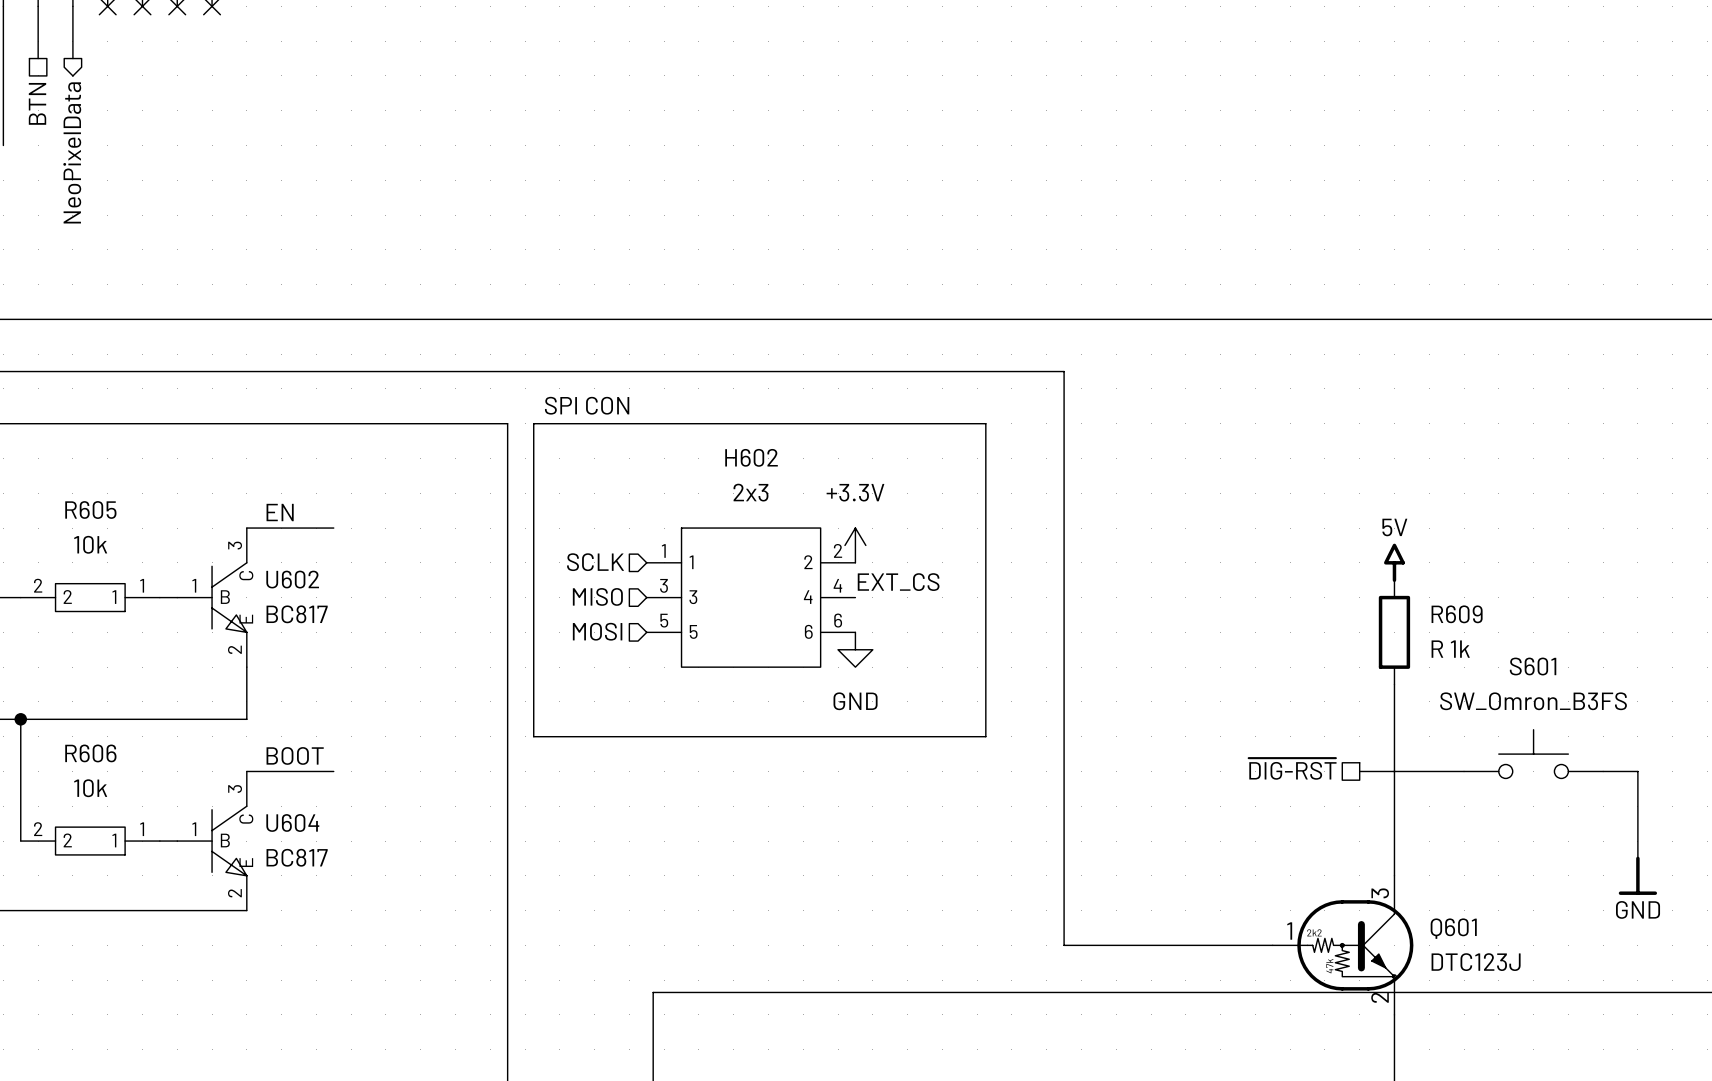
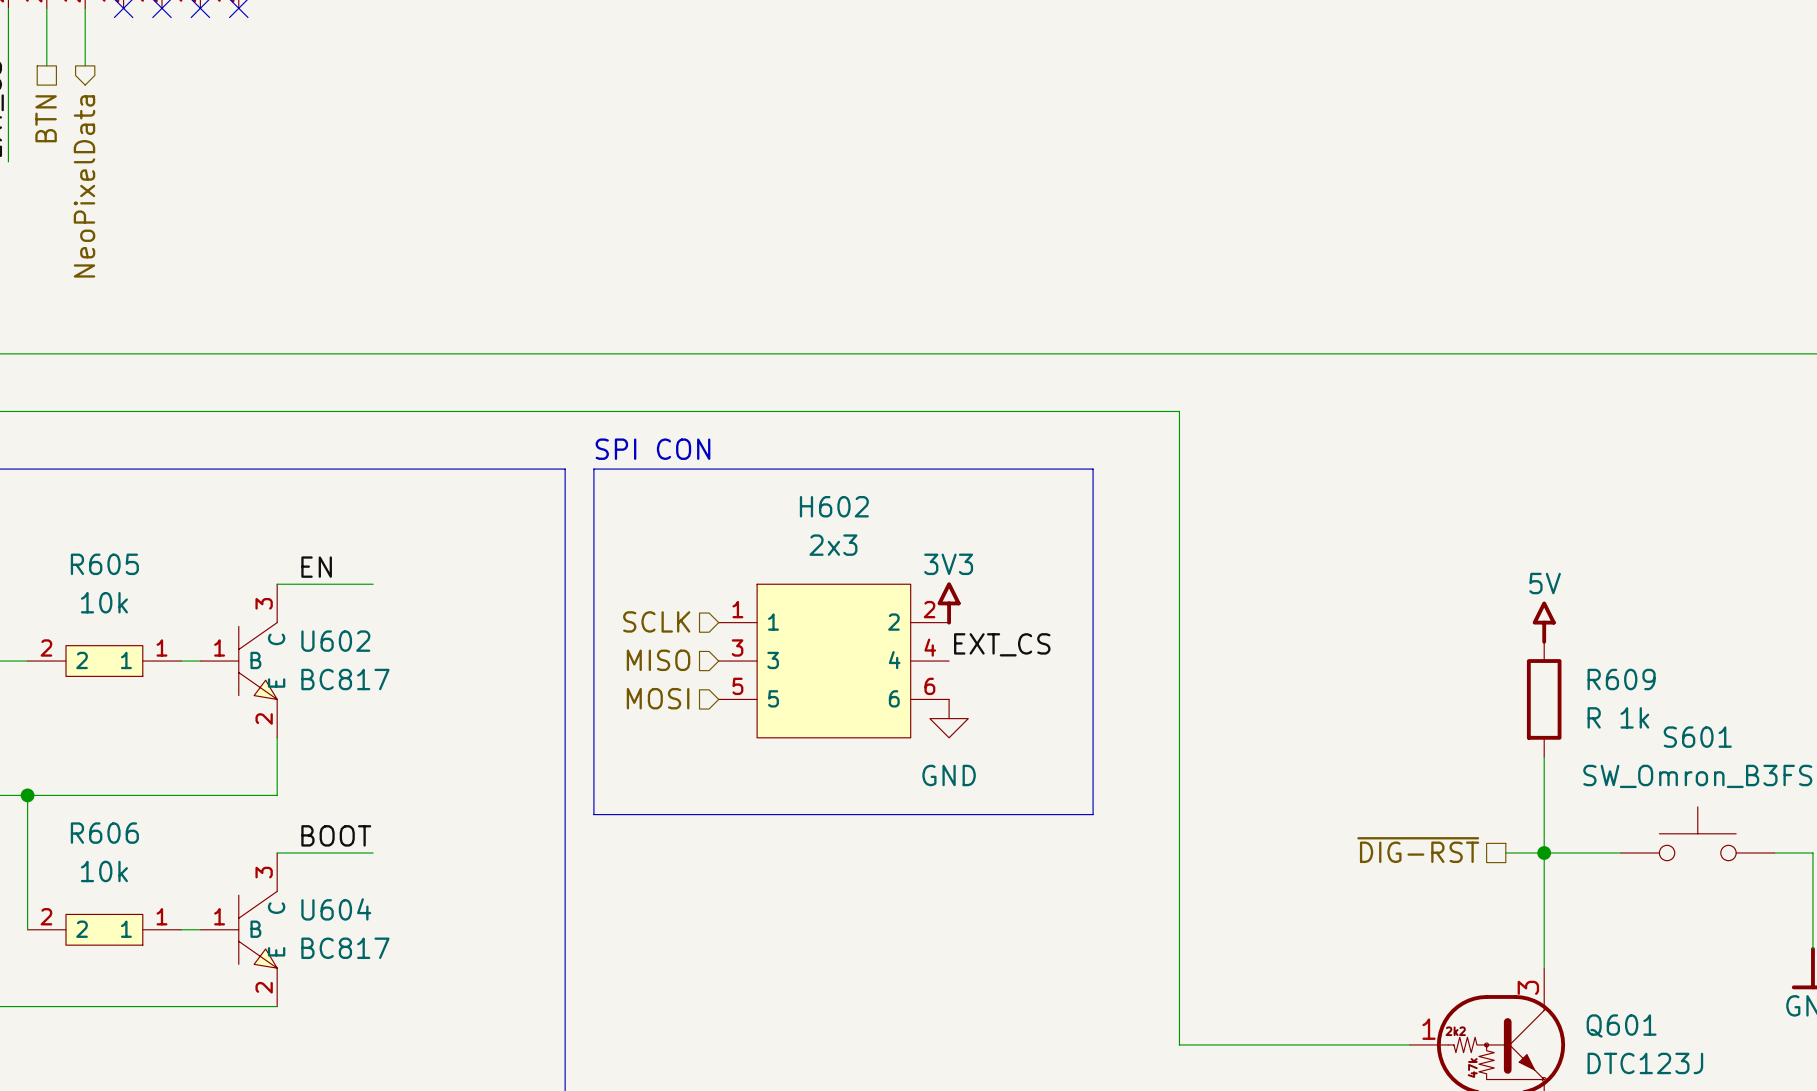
power symbol: +3.3V (855, 545) -> 3V3 (949, 603)
junction: none -> (1544, 853)

